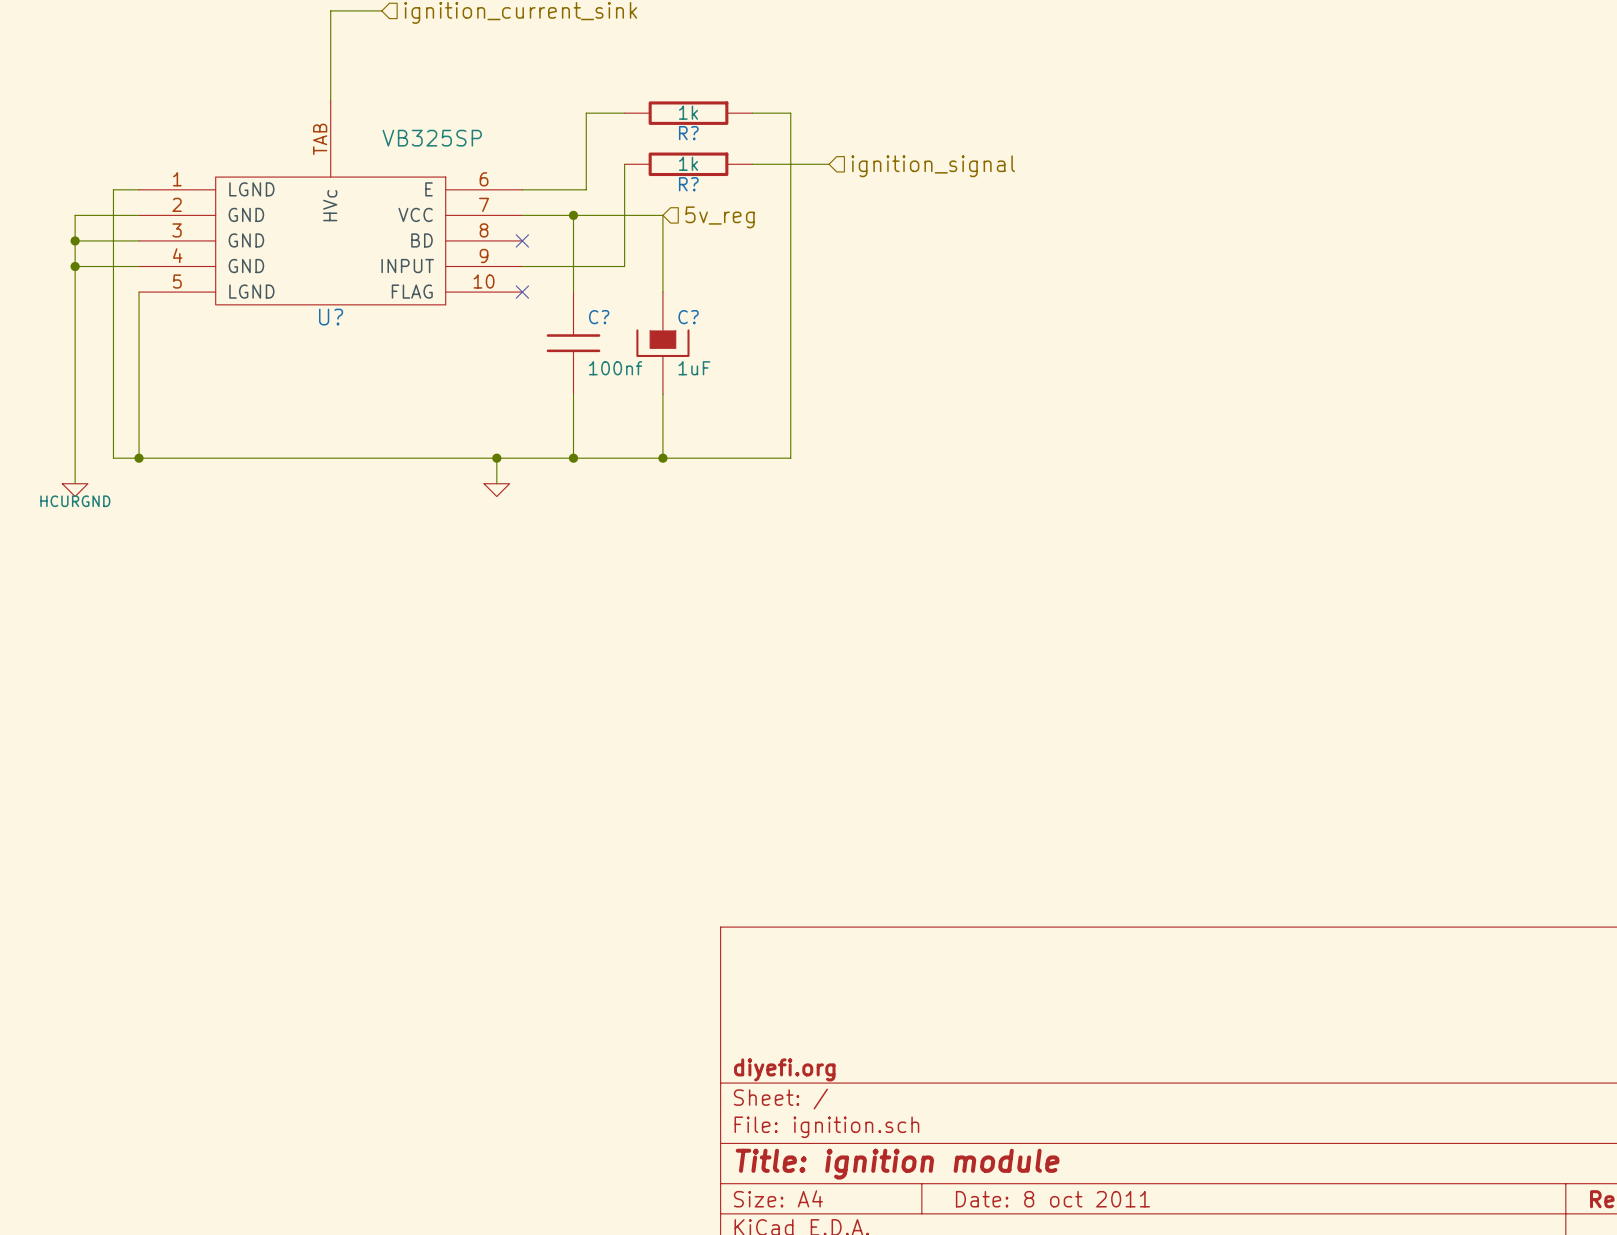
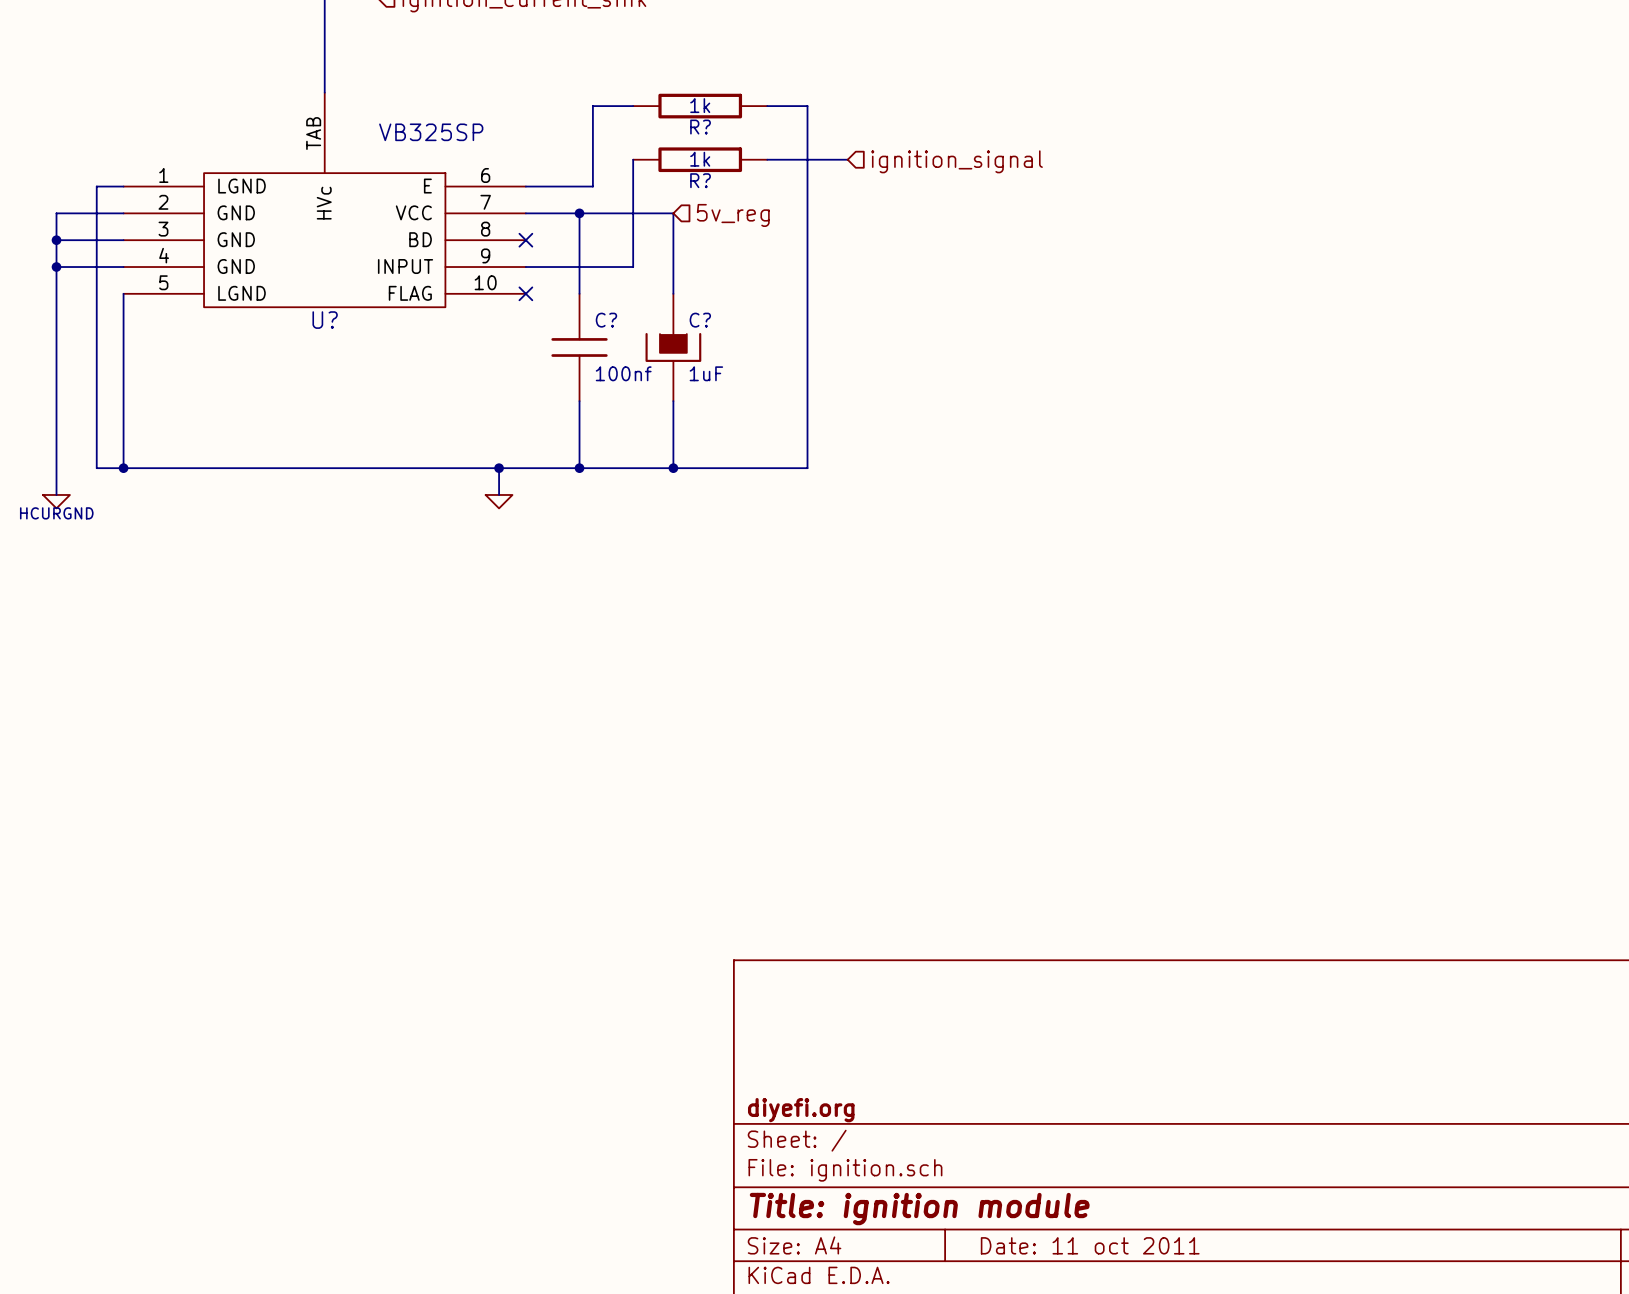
title block: Date: 8 oct 2011 (1052, 1199) -> Date: 11 oct 2011 (1090, 1245)

